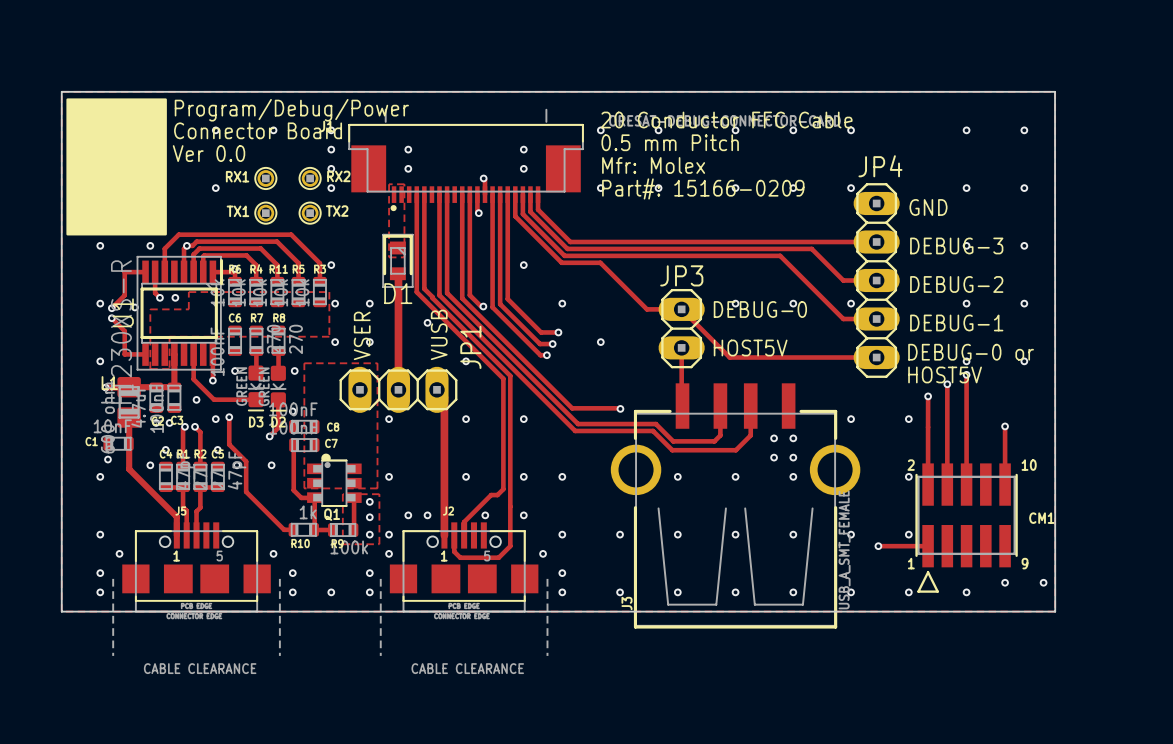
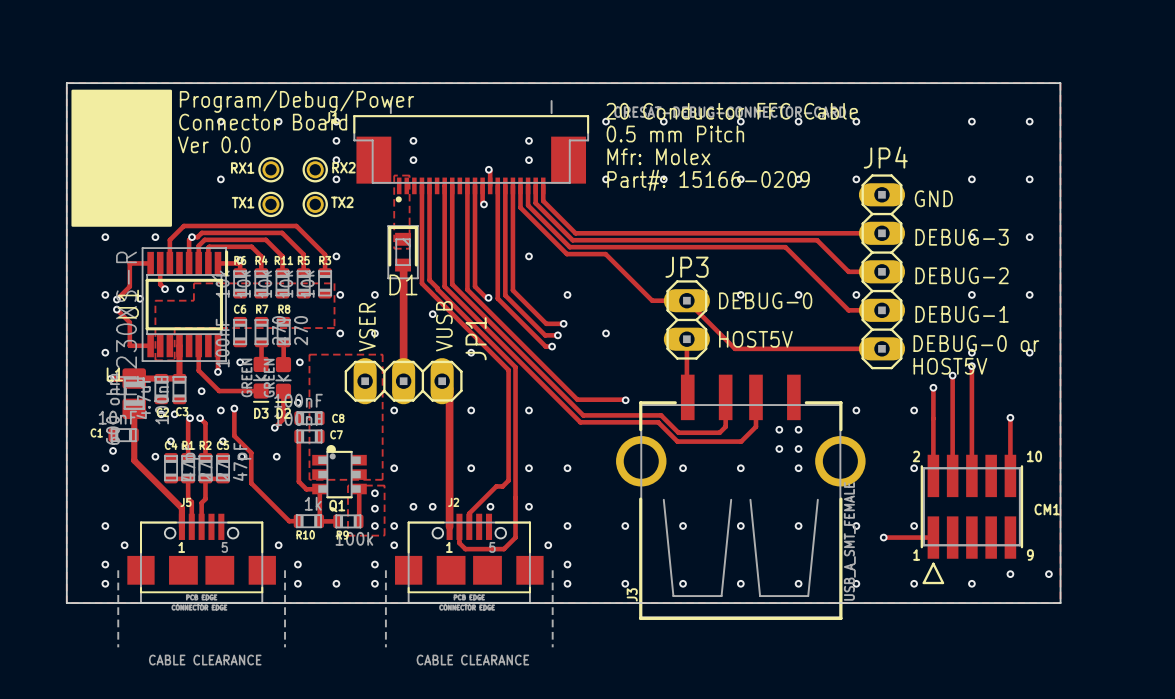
RX1 footprint: [254, 166, 278, 191] -> [258, 157, 284, 183]
RX2 footprint: [298, 166, 322, 191] -> [302, 157, 328, 183]
TX1 footprint: [254, 201, 278, 225] -> [258, 191, 284, 218]
TX2 footprint: [298, 201, 322, 225] -> [302, 191, 328, 218]

